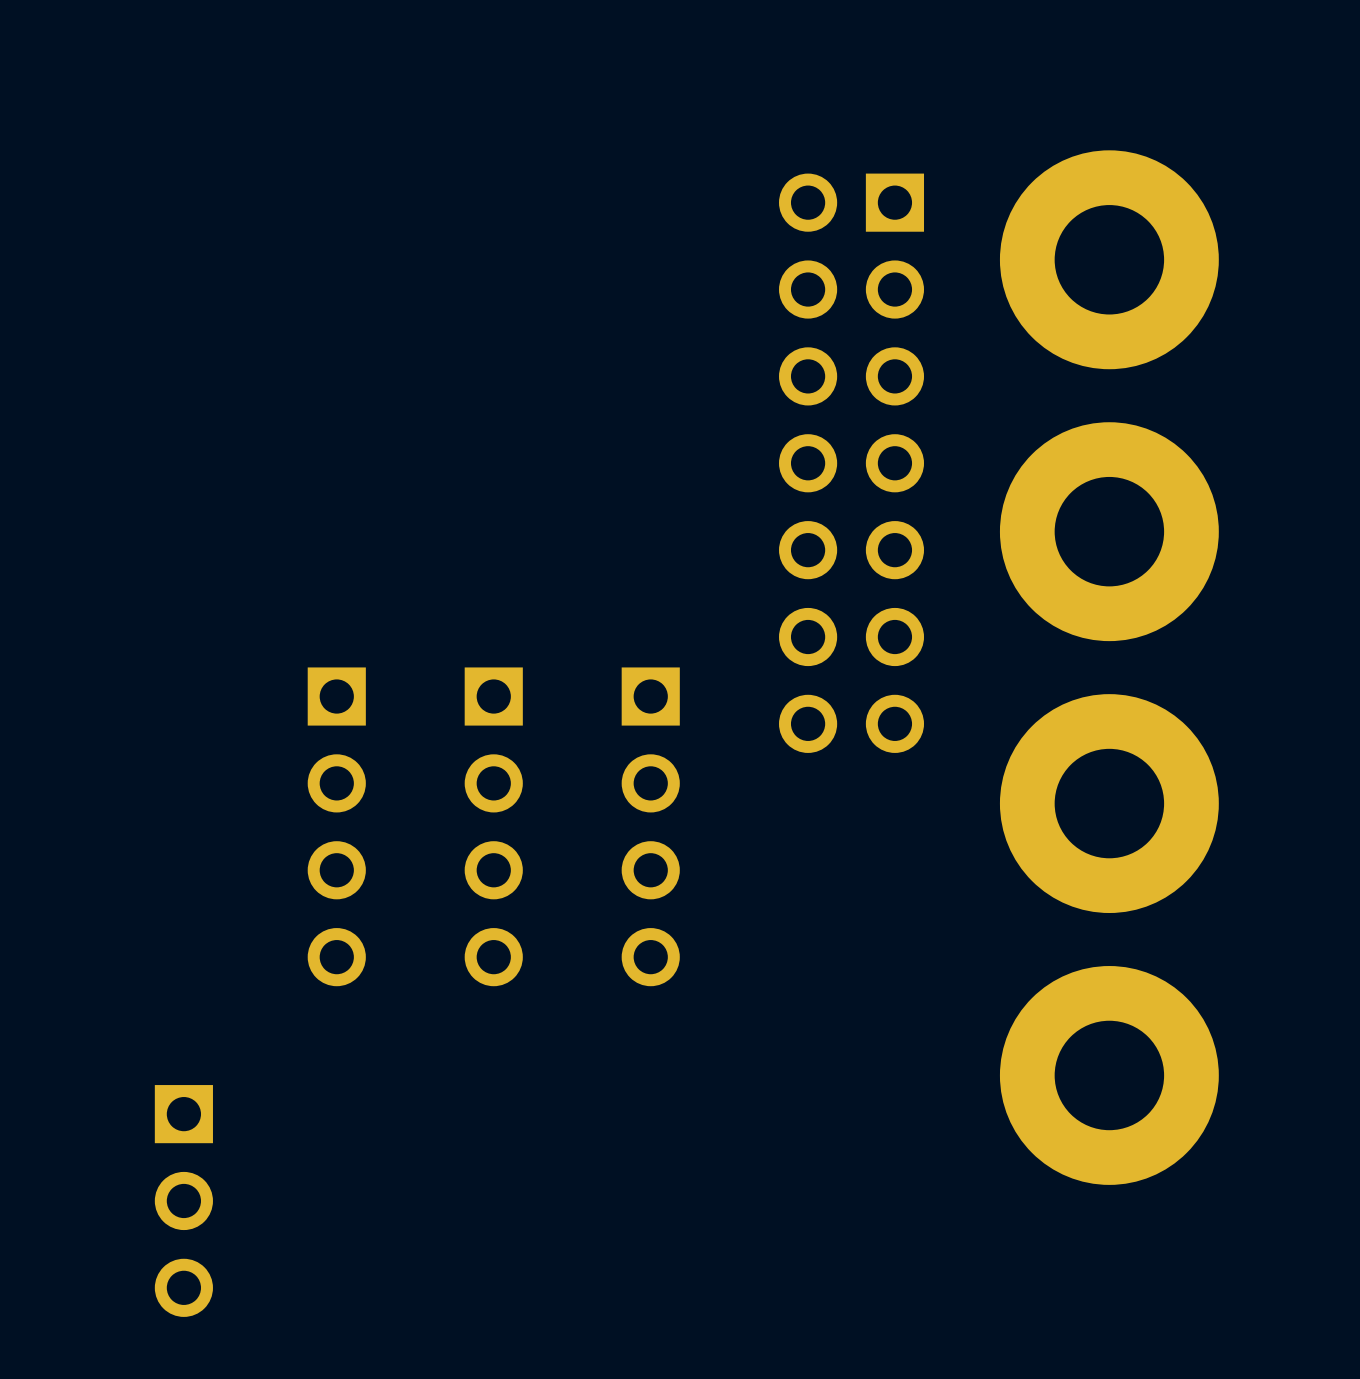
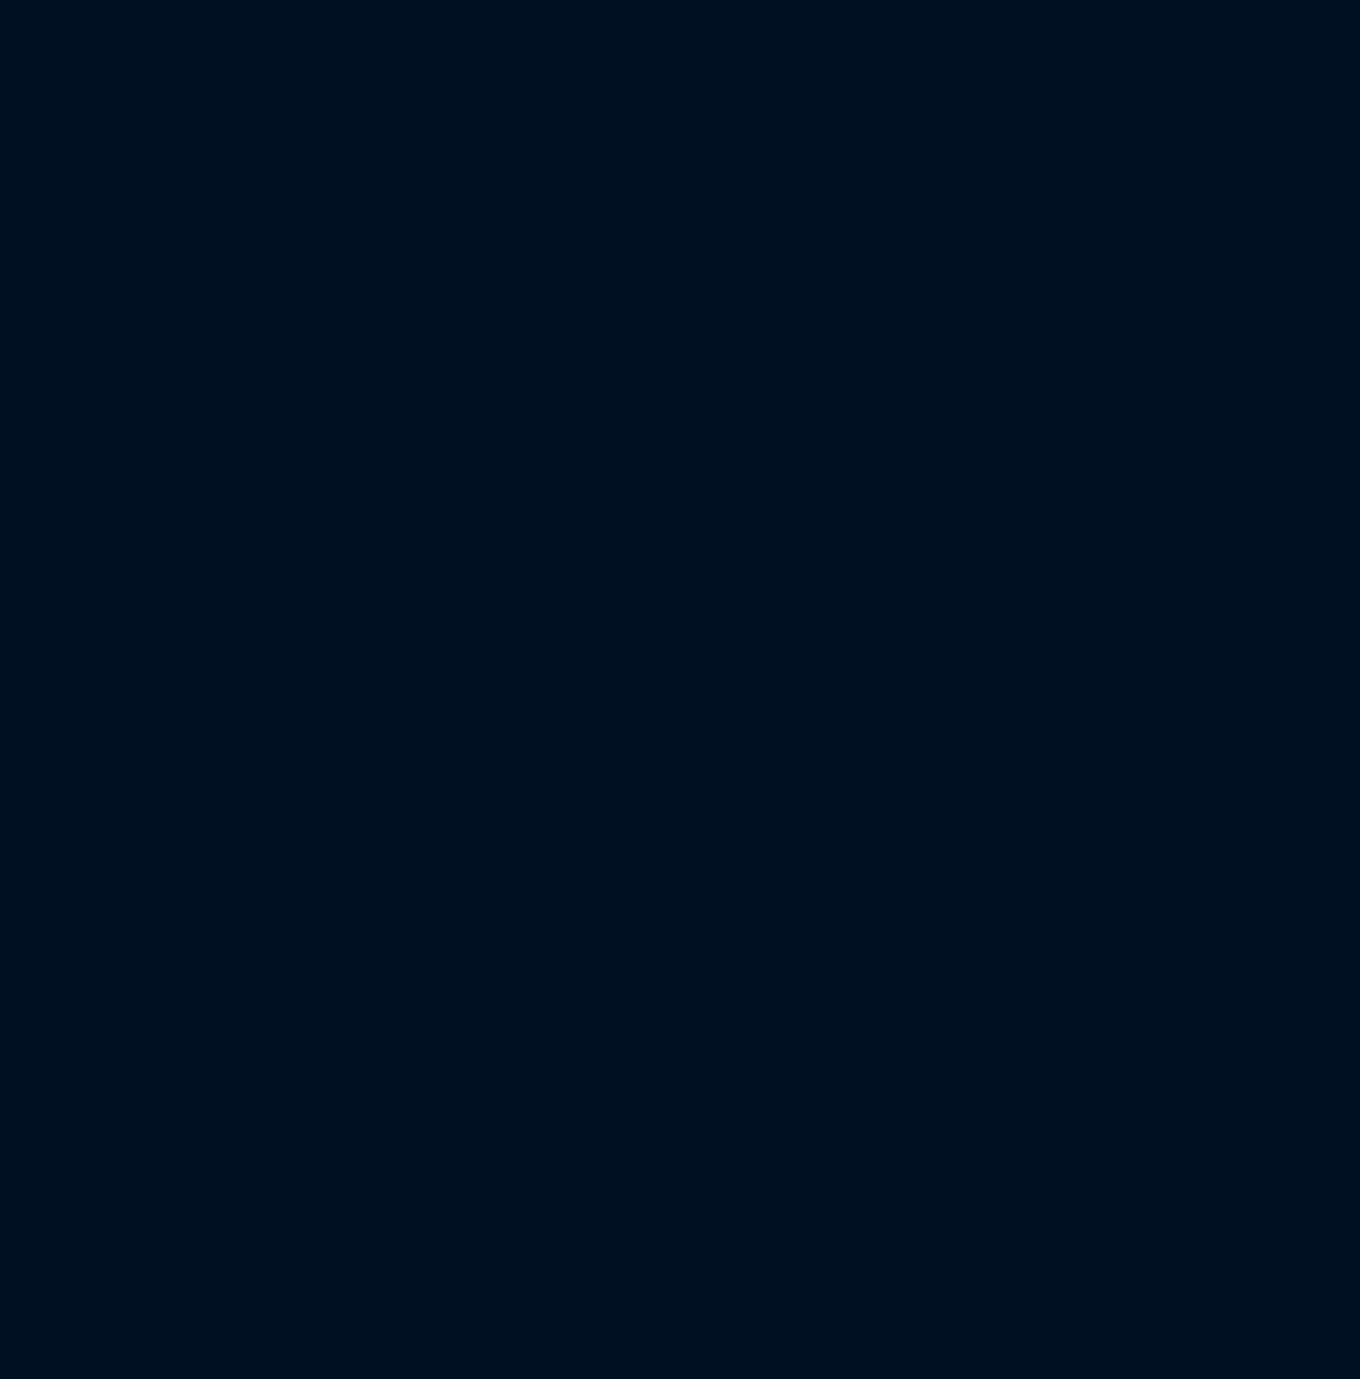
part: (1109, 259) -> none
part: (851, 463) -> none
part: (1109, 531) -> none
part: (1109, 803) -> none
part: (336, 826) -> none
part: (493, 826) -> none
part: (650, 826) -> none
part: (1109, 1075) -> none
part: (183, 1200) -> none

